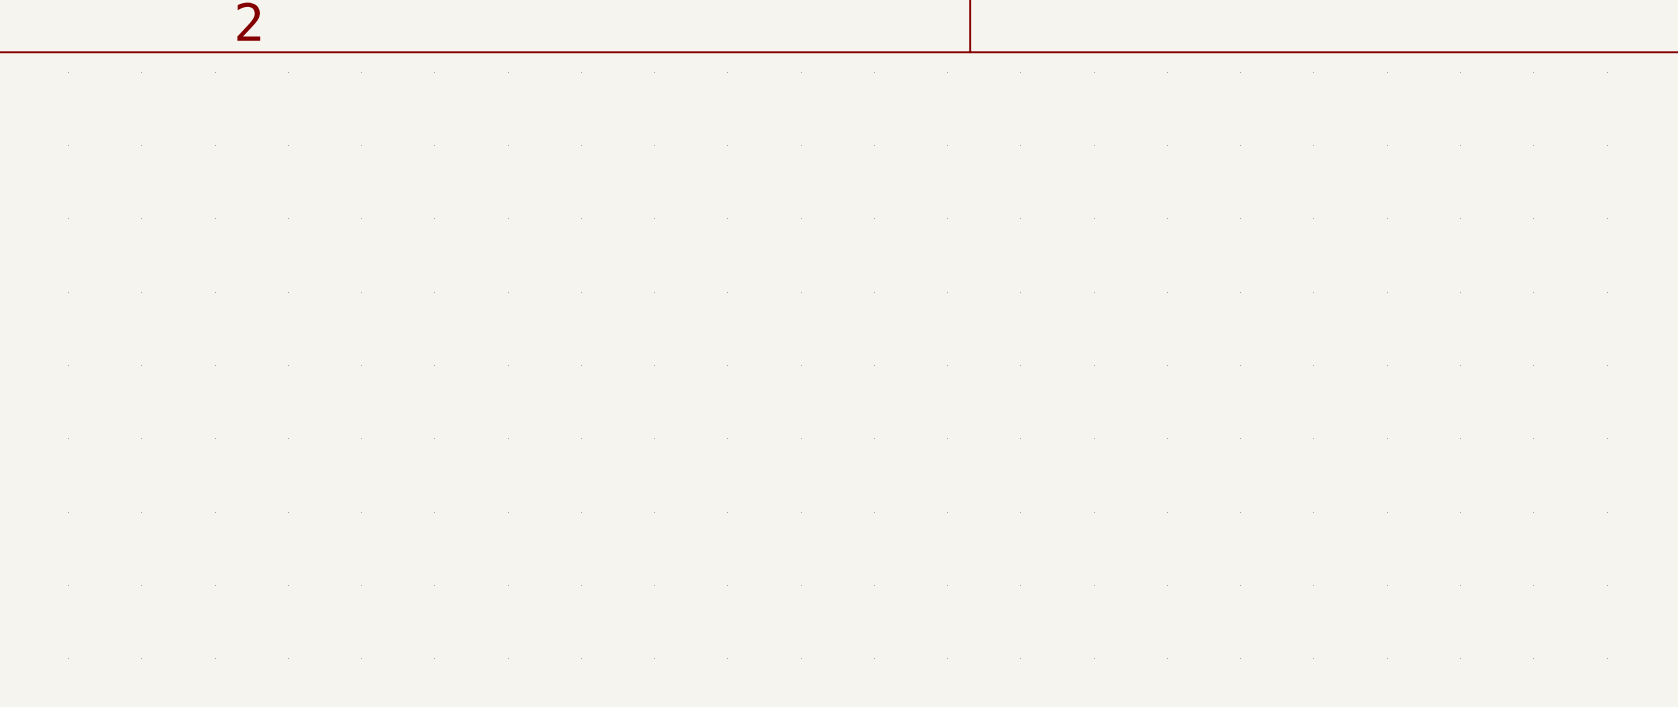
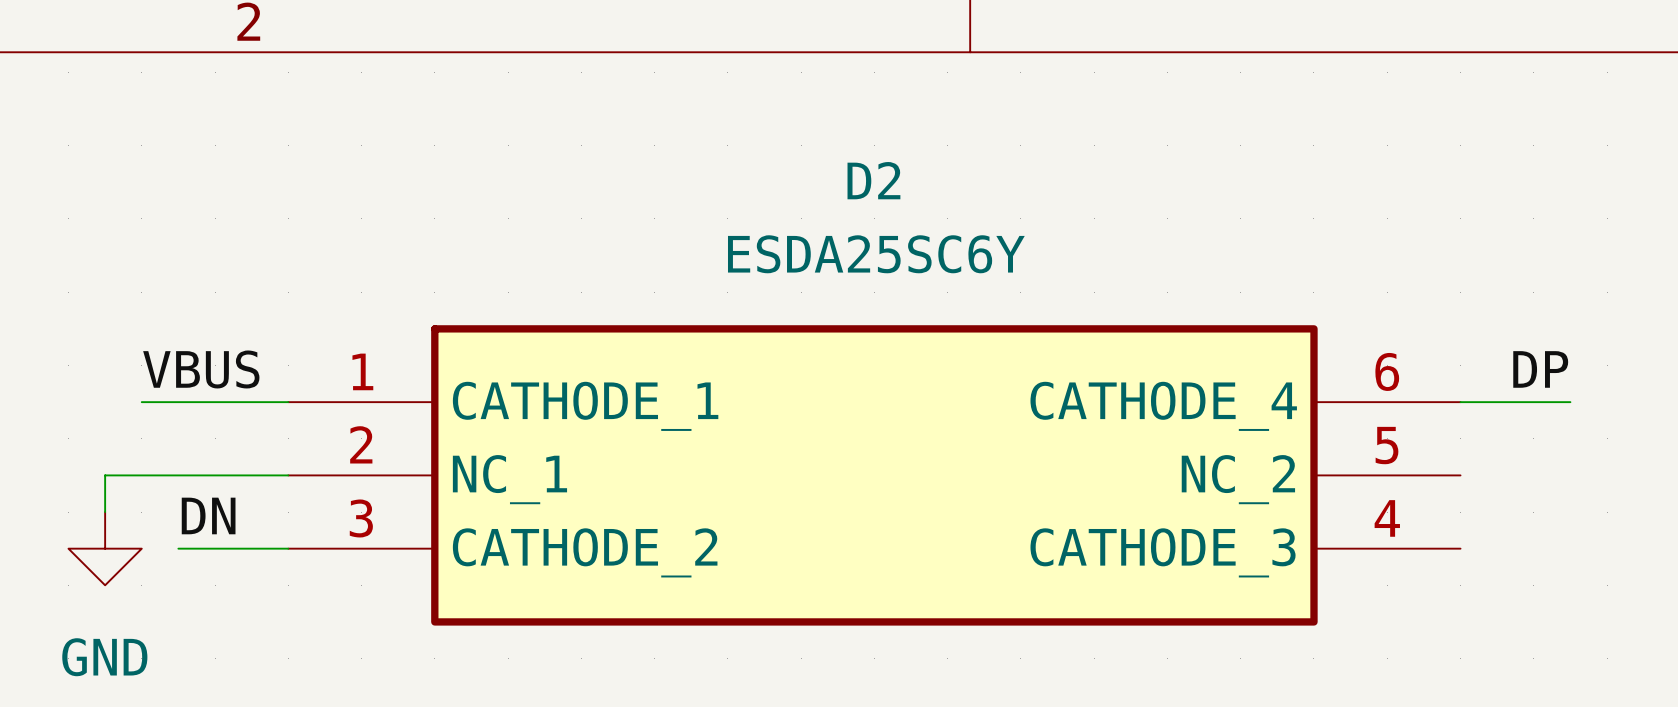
label: none -> VBUS (201, 369)
label: none -> DP (1540, 369)
wire: none -> (141, 402) (288, 402)
wire: none -> (1460, 402) (1570, 402)
wire: none -> (288, 475) (105, 475) (105, 512)
D2: none -> ESDA25SC6Y (874, 475)
label: none -> DN (208, 515)
power symbol: none -> GND (105, 548)
wire: none -> (178, 548) (288, 548)

